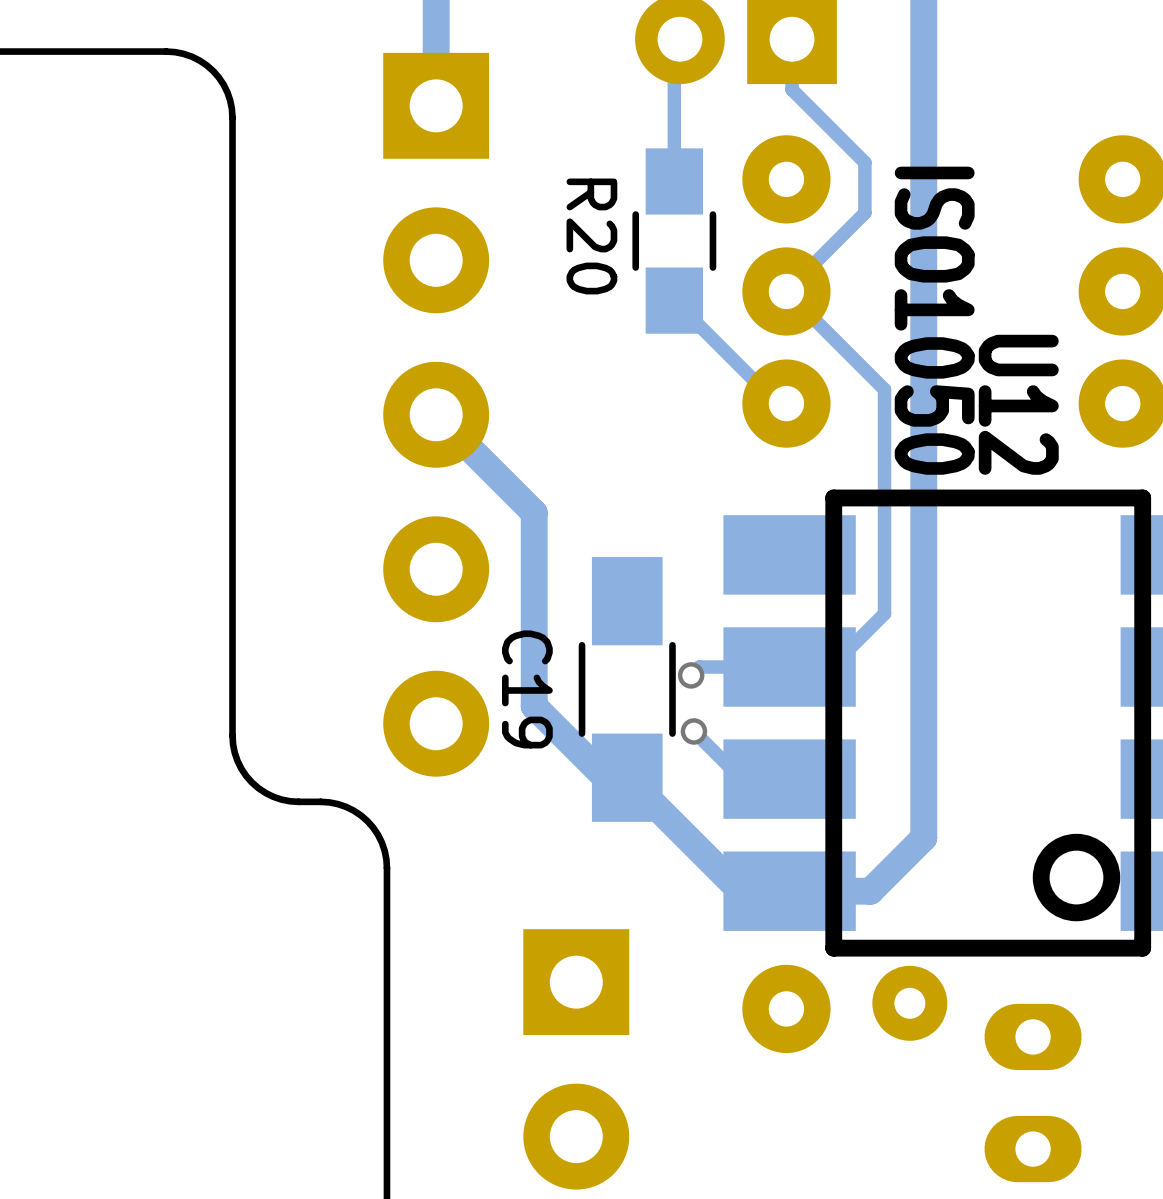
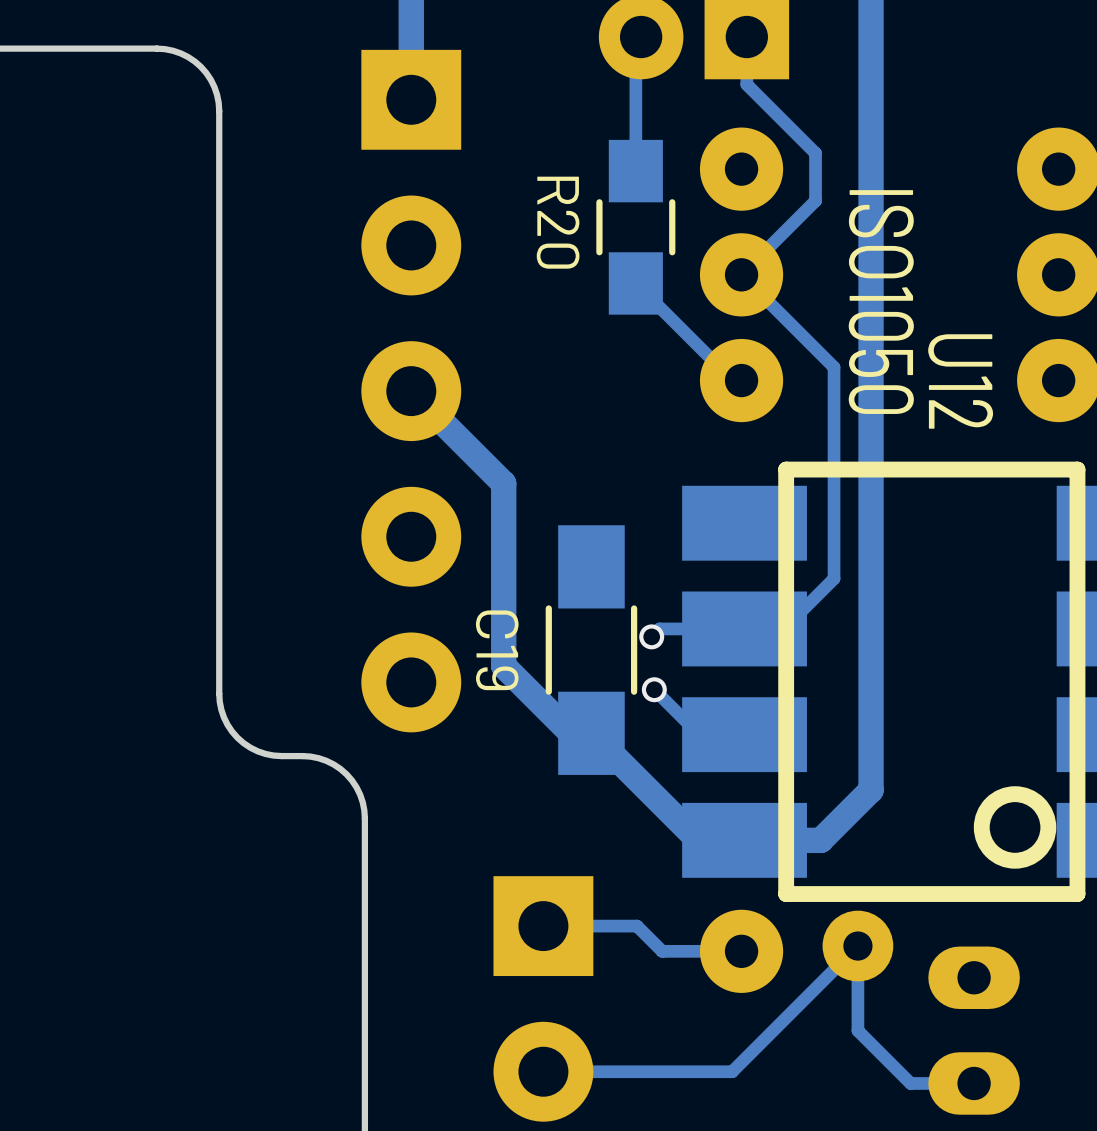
track: none -> (543, 926) (637, 926) (662, 951) (741, 951)
track: none -> (543, 1071) (732, 1071) (857, 946) (857, 1030) (910, 1083) (974, 1083)

